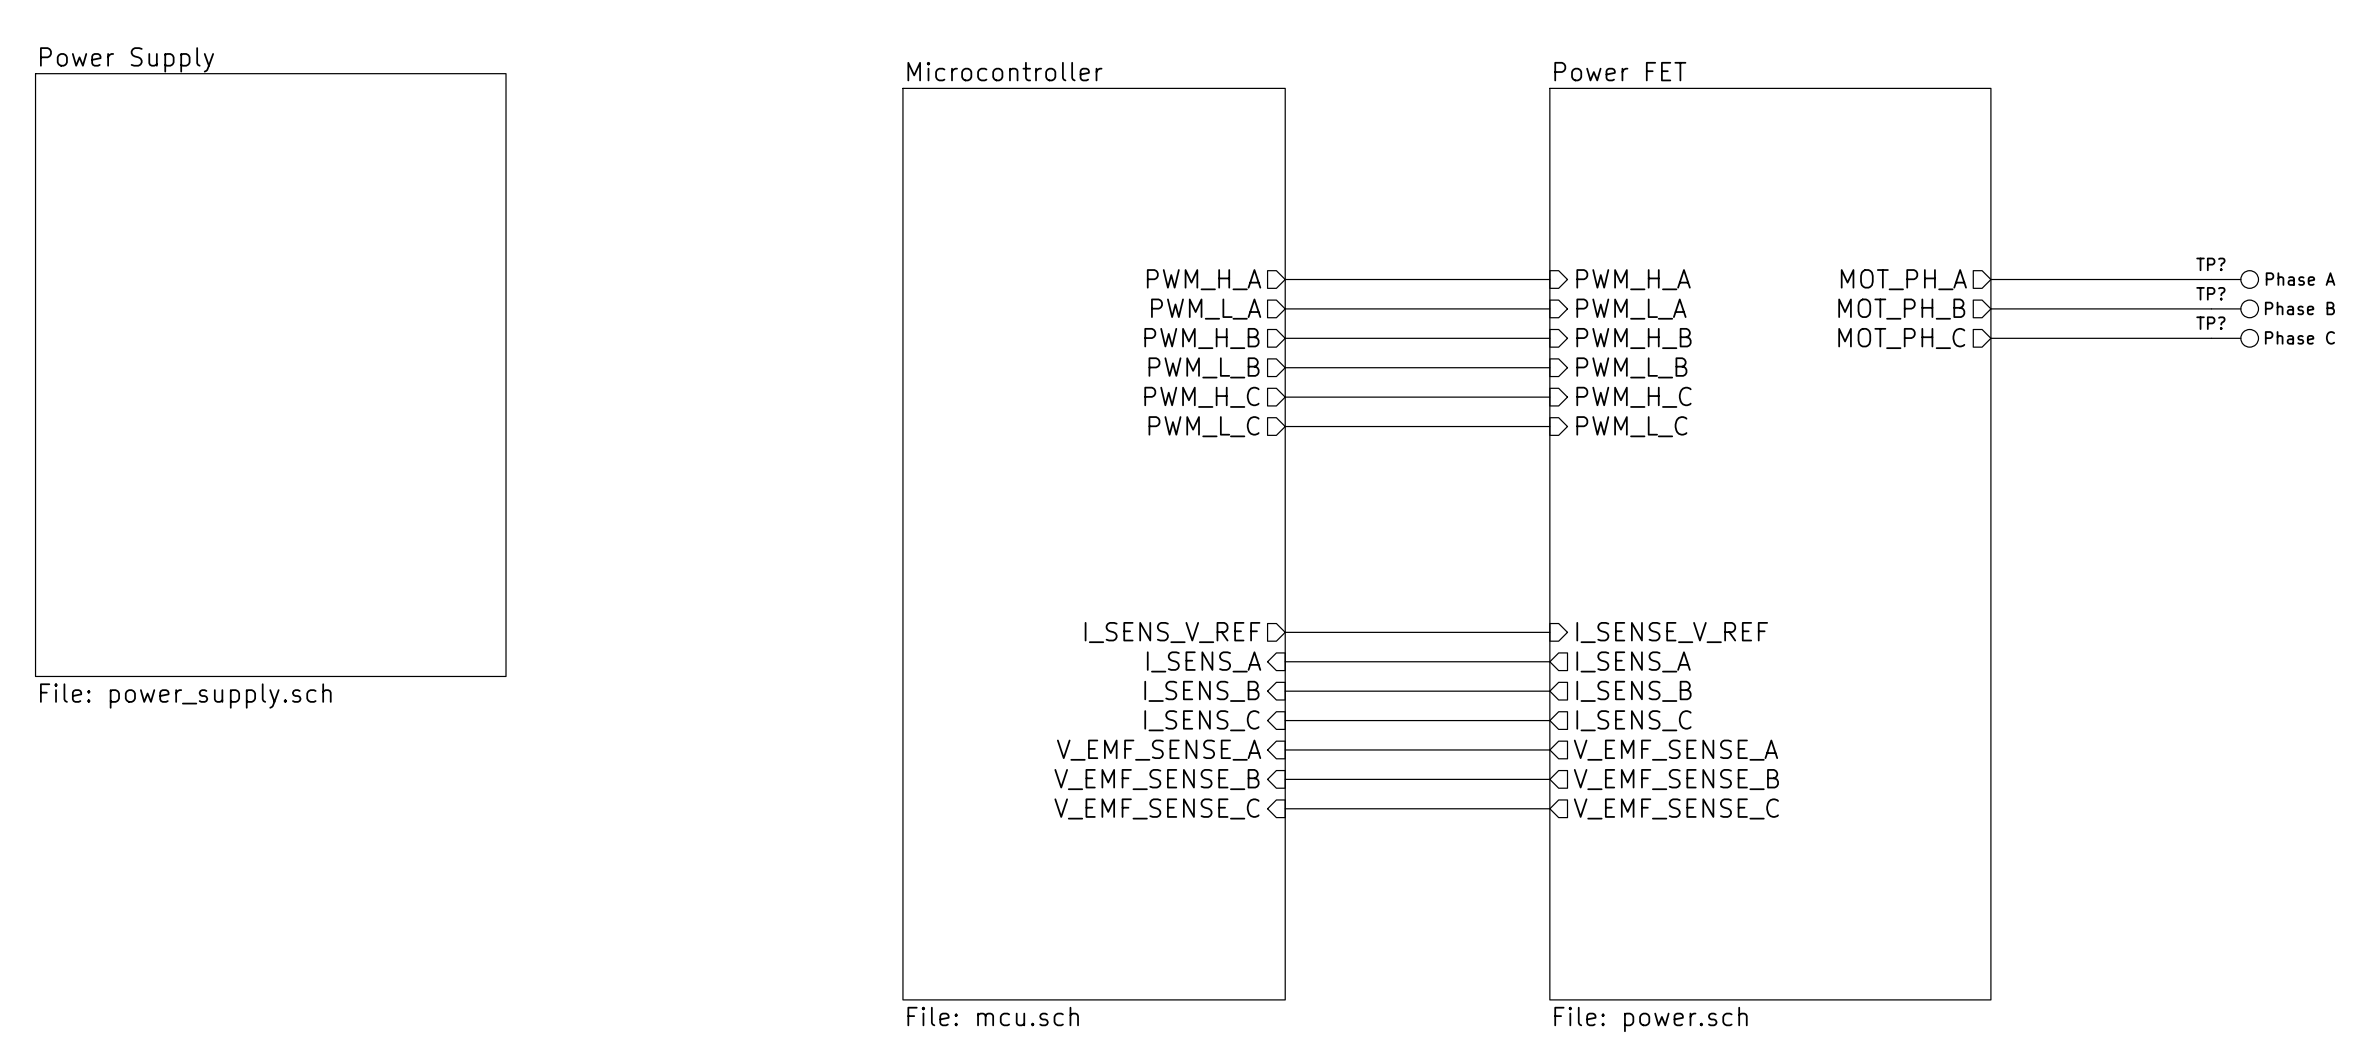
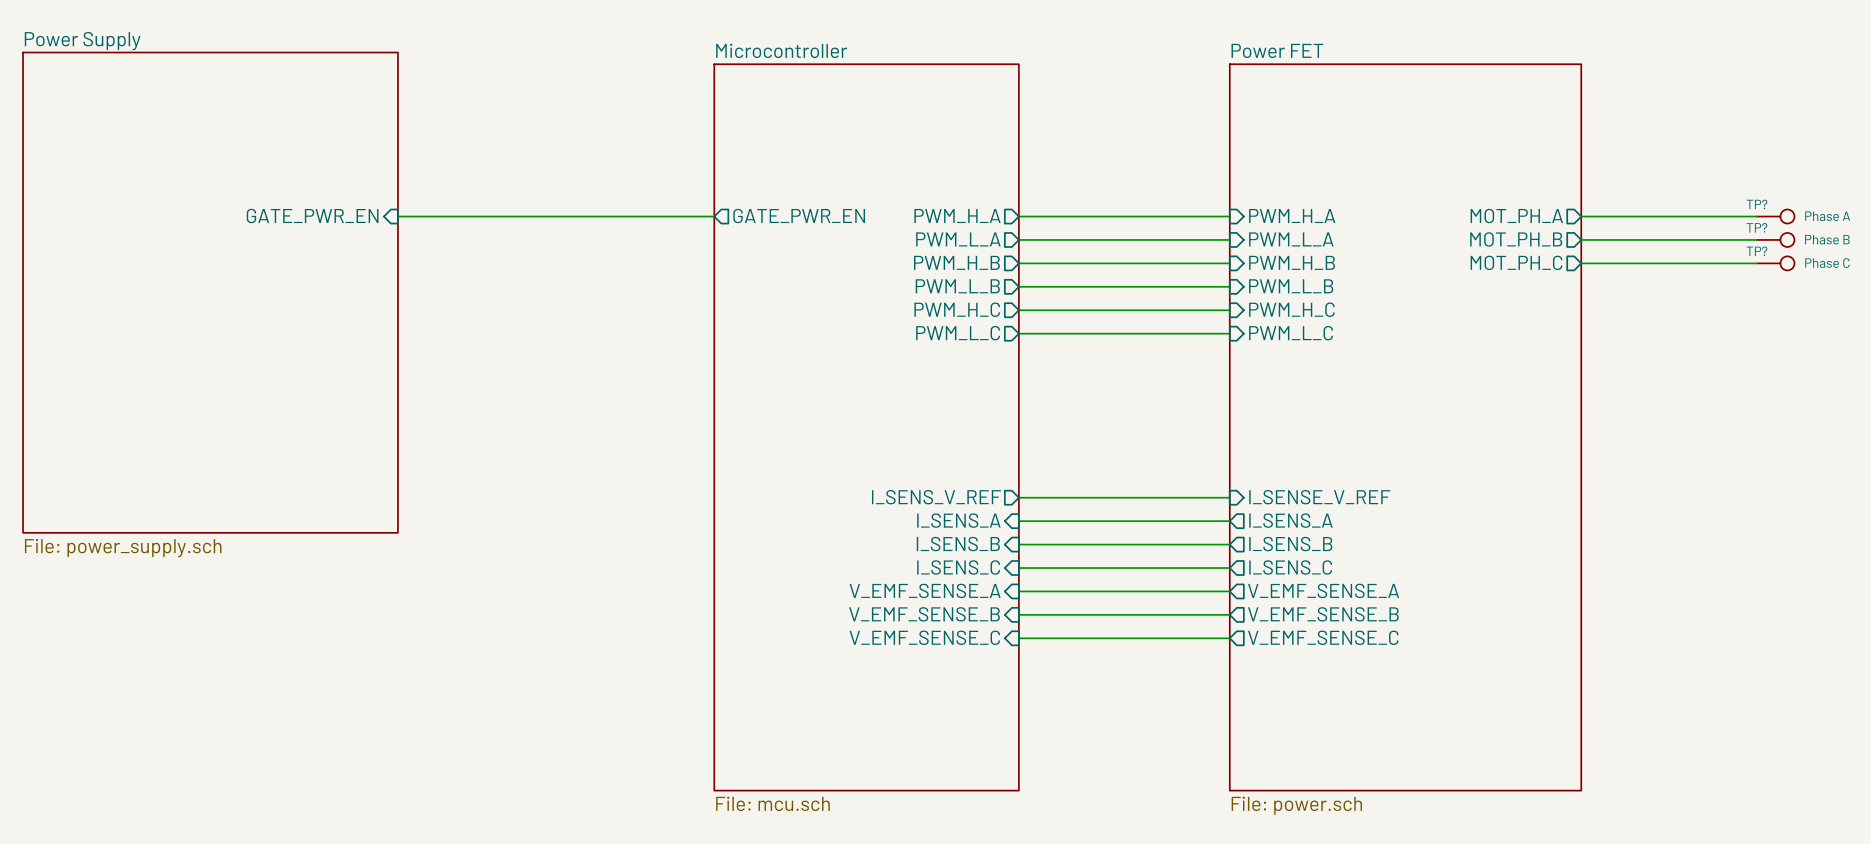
sheet pin: none -> GATE_PWR_EN (312, 216)
wire: none -> (397, 216) (714, 216)
sheet pin: none -> GATE_PWR_EN (799, 216)

